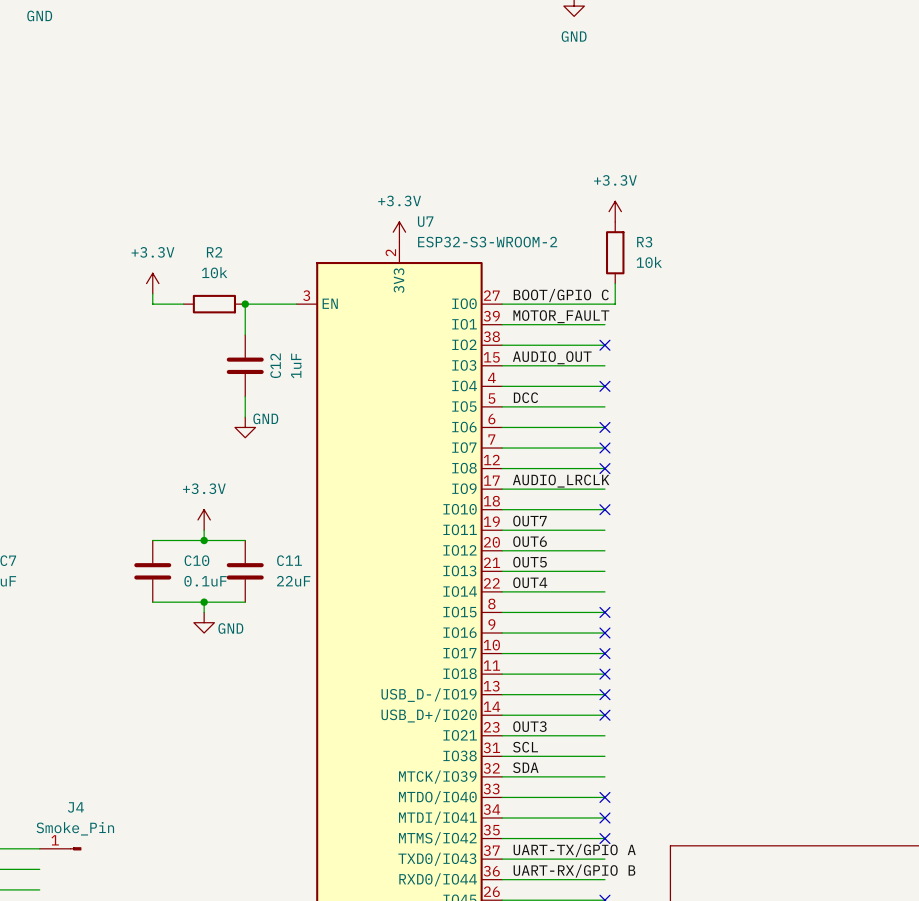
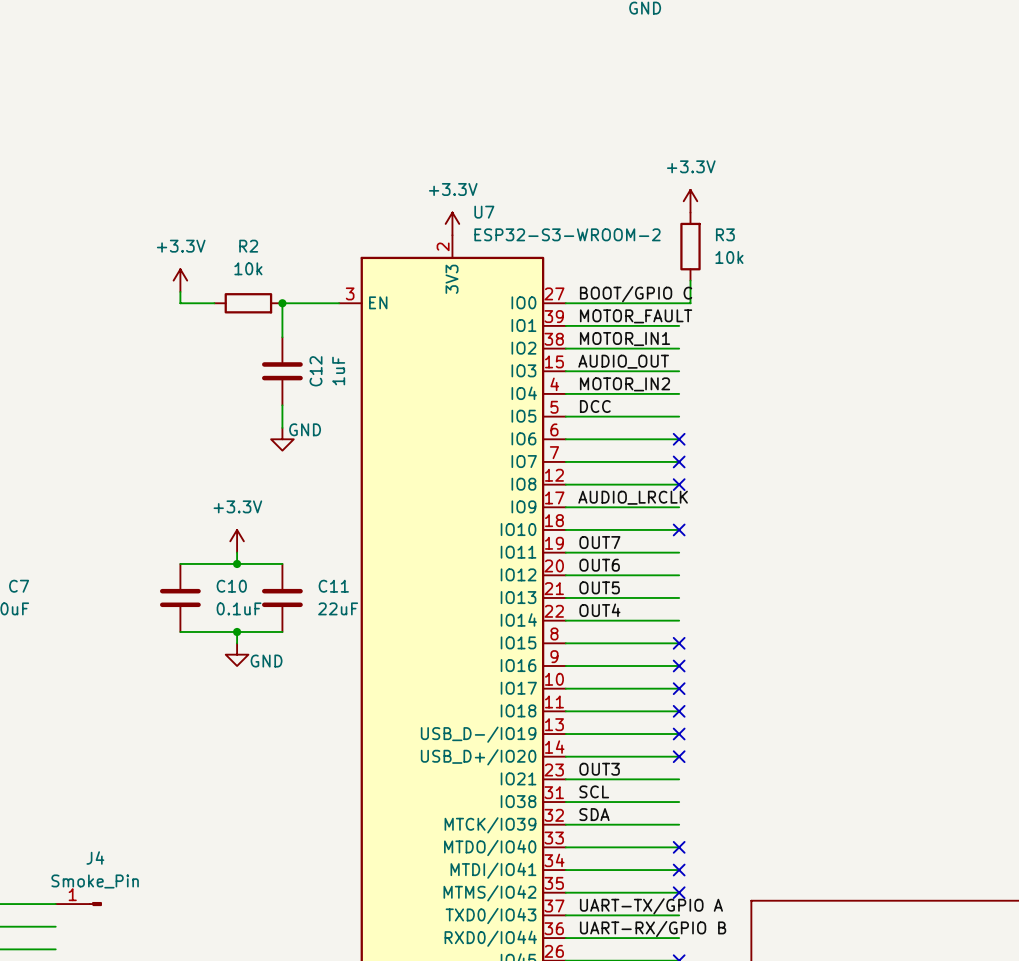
label: none -> MOTOR_IN1 (624, 339)
no-connect mark: (604, 345) -> none
label: none -> MOTOR_IN2 (624, 384)
no-connect mark: (604, 386) -> none

